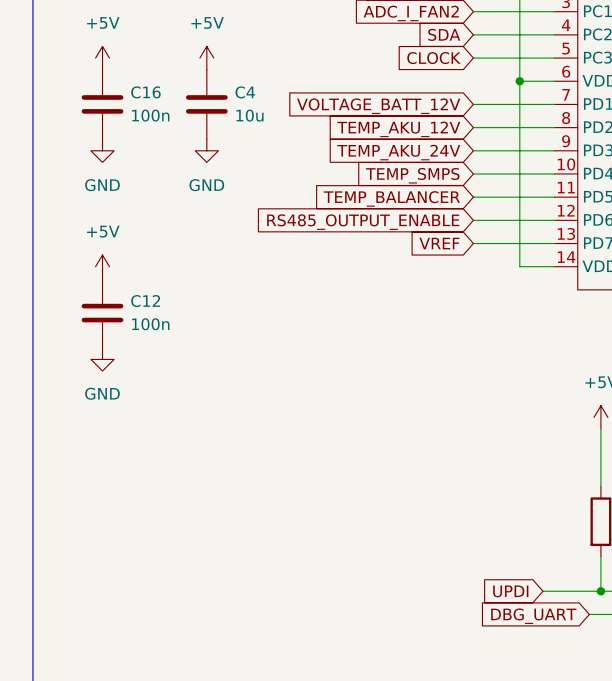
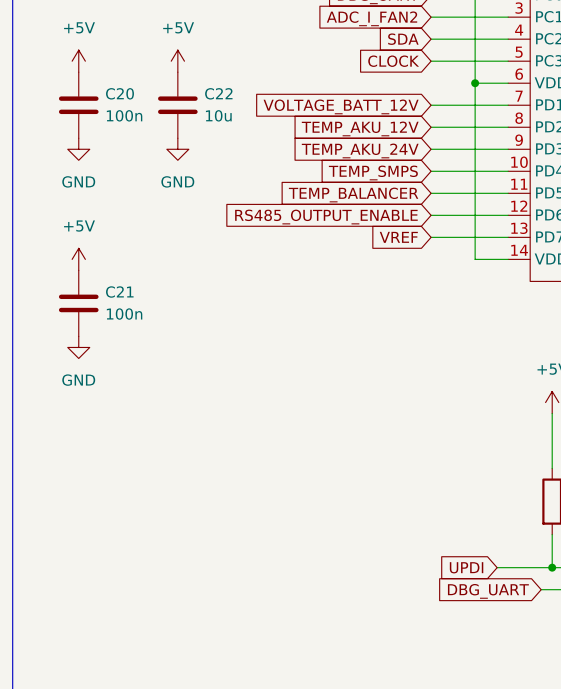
C16 name: C16 (145, 92) -> C20 (119, 93)
C4 name: C4 (245, 92) -> C22 (218, 93)
C12 name: C12 (145, 301) -> C21 (119, 292)

